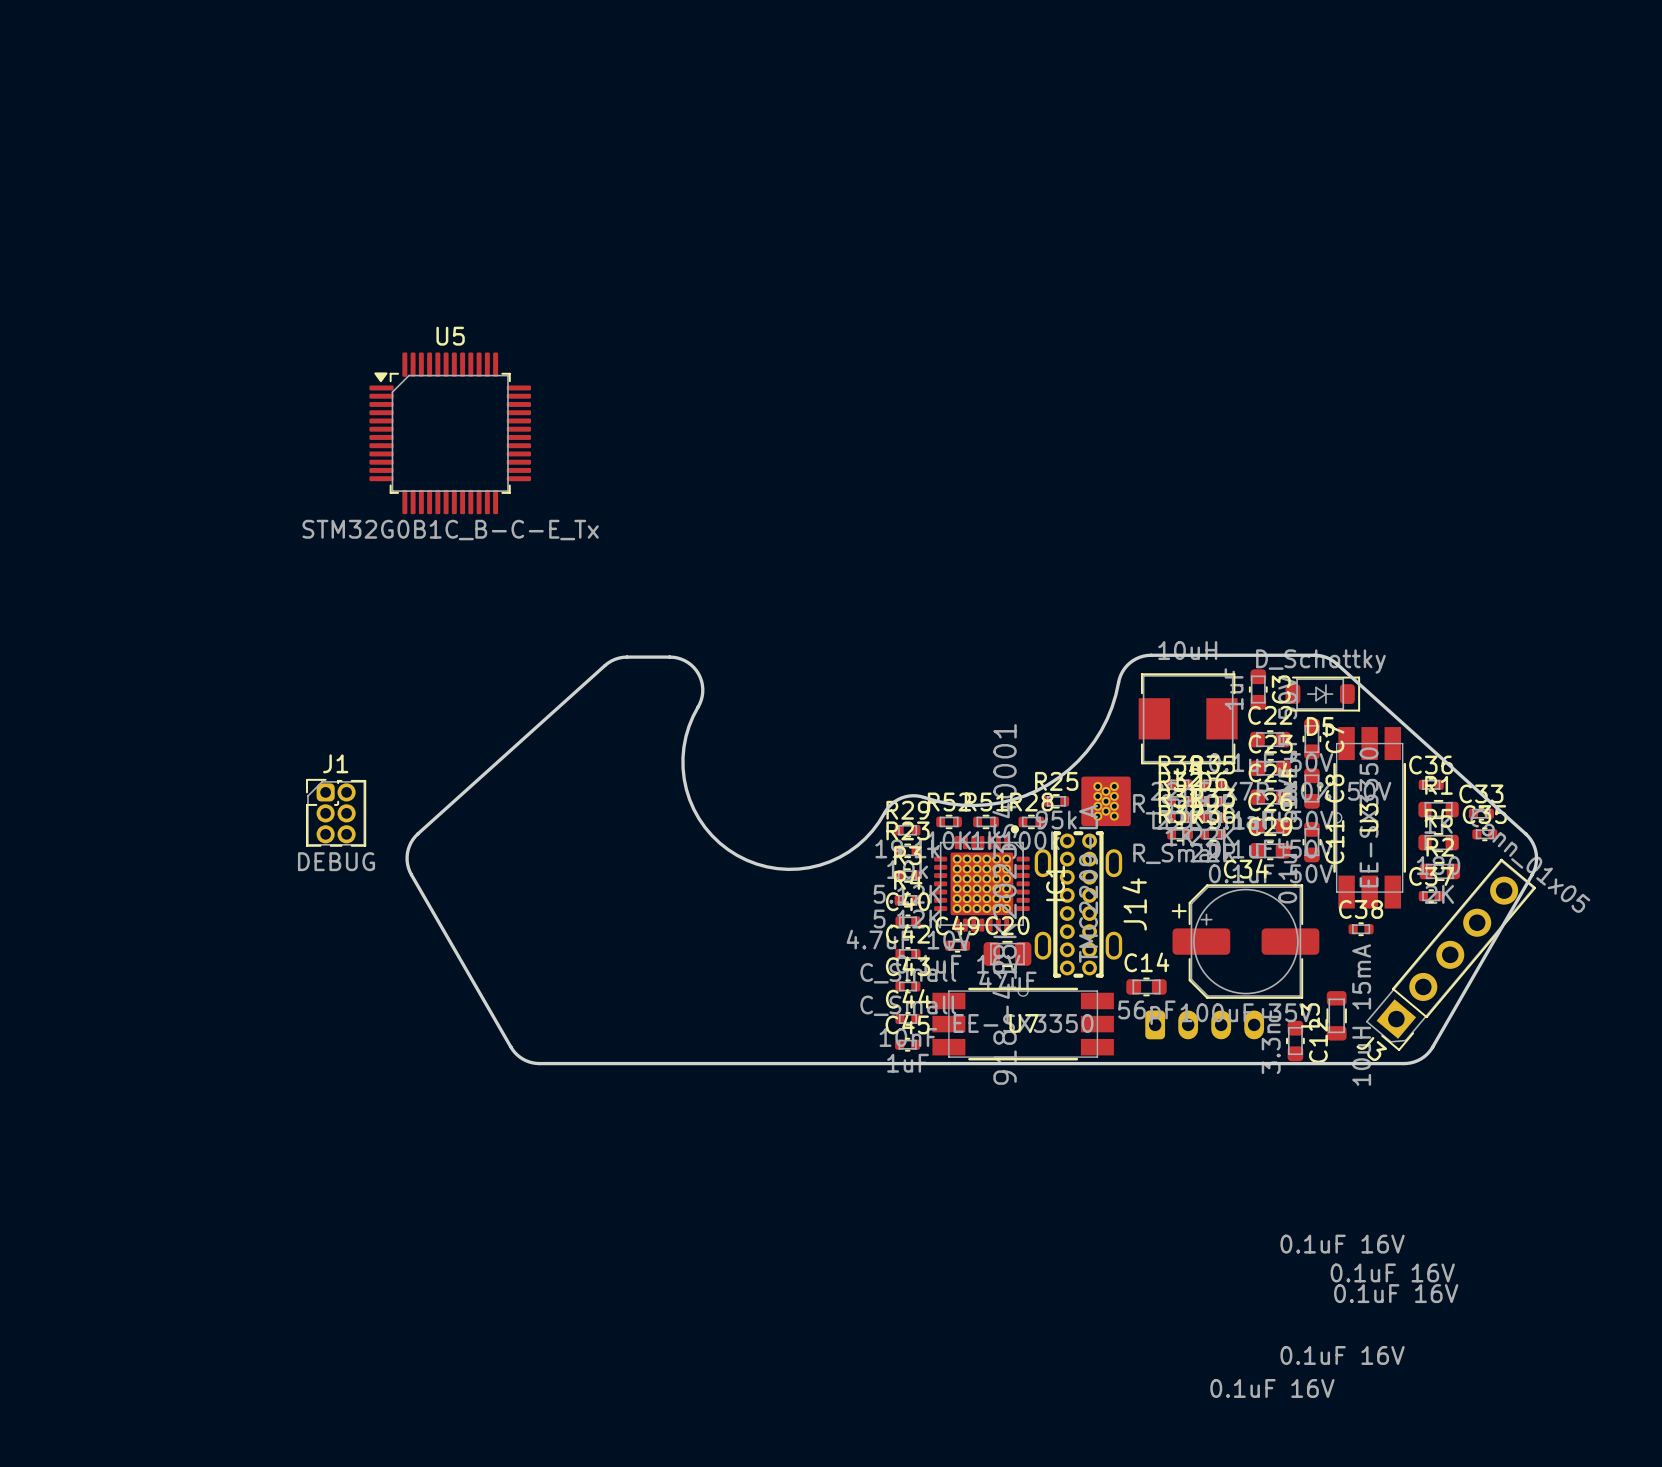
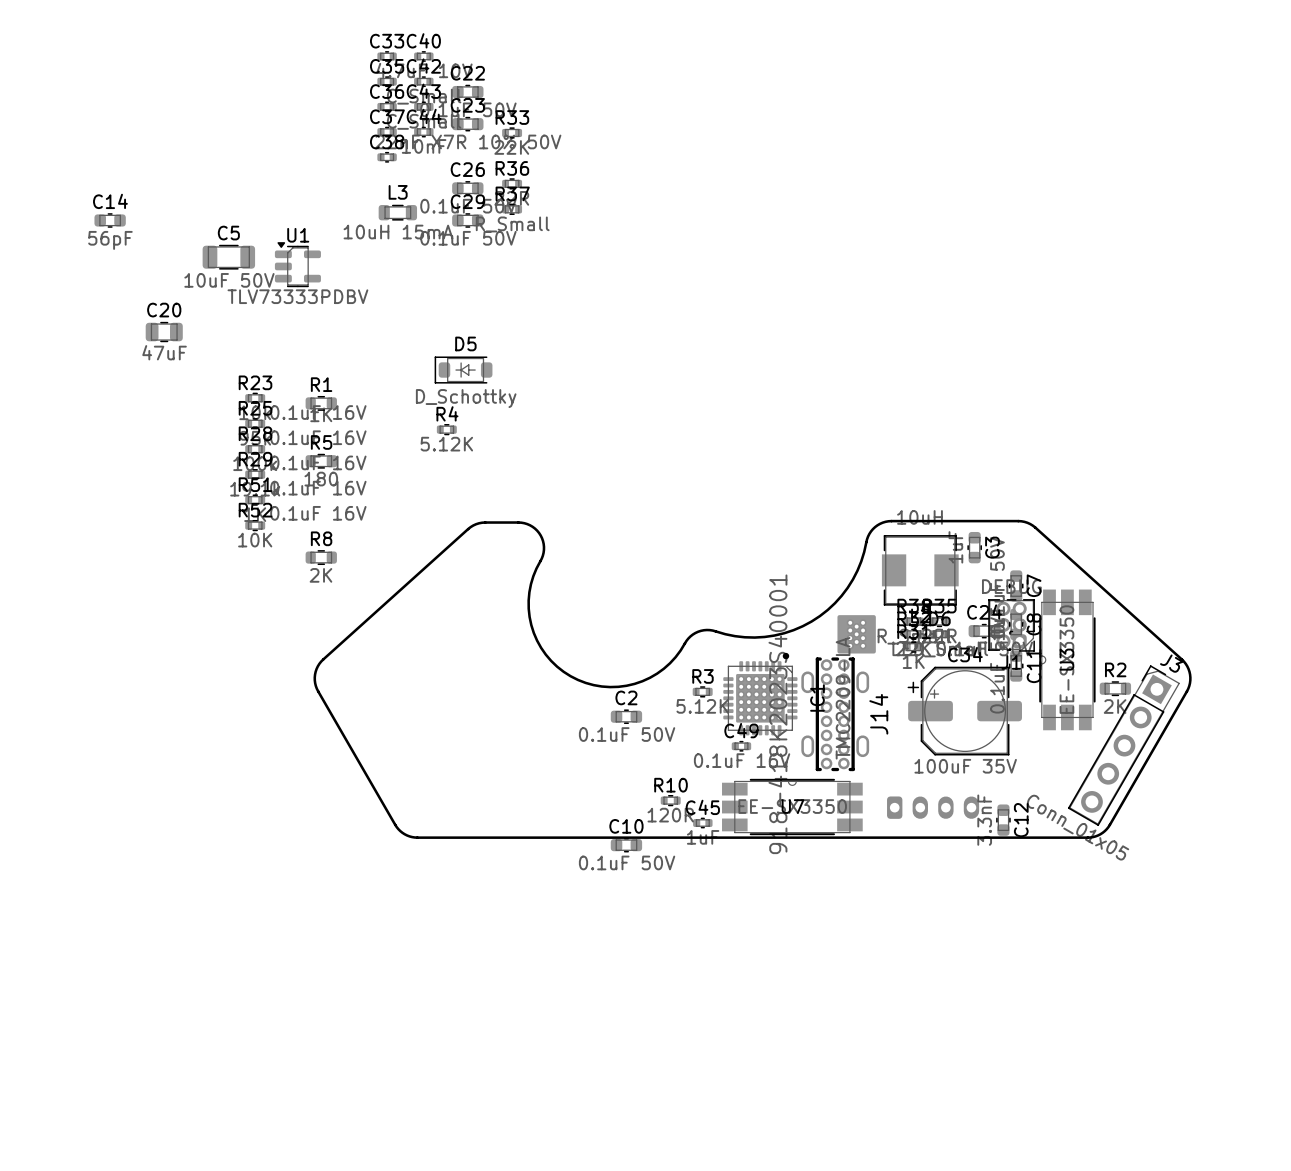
C5: none -> 10uF 50V (228, 257)
U1: none -> TLV73333PDBV (297, 264)
U5: STM32G0B1C_B-C-E_Tx (450, 433) -> none
D5 rotation: 0° (1322, 694) -> 180° (463, 370)
D5 position: (1322, 694) -> (463, 370)
R8: none -> 2K (321, 557)
C22 position: (1270, 739) -> (467, 92)
C23 position: (1270, 768) -> (467, 124)
C36 position: (1431, 784) -> (387, 106)
R25 position: (1056, 801) -> (255, 423)
R1 position: (1438, 809) -> (321, 403)
J1 rotation: 0° (336, 812) -> 180° (1011, 625)
J1 position: (336, 812) -> (1011, 625)
C33 position: (1481, 813) -> (387, 56)
R33 position: (1212, 817) -> (512, 132)
U3 position: (1369, 817) -> (1067, 659)
R52 position: (949, 821) -> (255, 525)
R51 position: (986, 821) -> (255, 500)
R28 position: (1031, 821) -> (255, 449)
C26 position: (1270, 826) -> (467, 188)
R29 position: (907, 830) -> (255, 474)
R37 position: (1180, 834) -> (512, 209)
R36 position: (1213, 834) -> (512, 183)
C35 position: (1484, 834) -> (387, 81)
R5 position: (1438, 842) -> (321, 461)
R23 position: (907, 850) -> (255, 398)
C29 position: (1270, 850) -> (467, 220)
C37 position: (1431, 896) -> (387, 132)
R4 position: (907, 900) -> (446, 429)
C2: none -> 0.1uF 50V (626, 716)
C40 position: (907, 921) -> (423, 56)
C38 position: (1361, 929) -> (387, 157)
C34 position: (1245, 941) -> (964, 711)
C42 position: (907, 953) -> (423, 81)
C20 position: (1007, 953) -> (164, 332)
J3 rotation: 0° (1451, 954) -> 170° clockwise (1123, 745)
C43 position: (907, 986) -> (423, 106)
C14 position: (1146, 986) -> (110, 220)
R10: none -> 120R (670, 800)
L3 rotation: 0° (1336, 1015) -> 90° clockwise (397, 212)
L3 position: (1336, 1015) -> (397, 212)
C44 position: (907, 1018) -> (423, 132)
C10: none -> 0.1uF 50V (626, 845)

